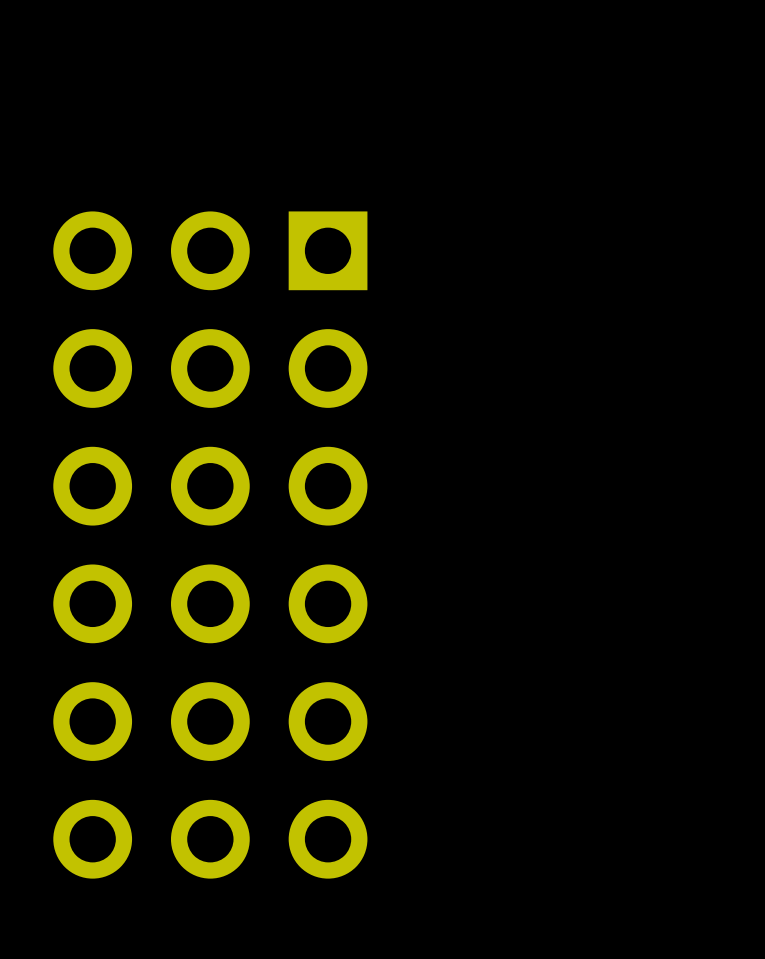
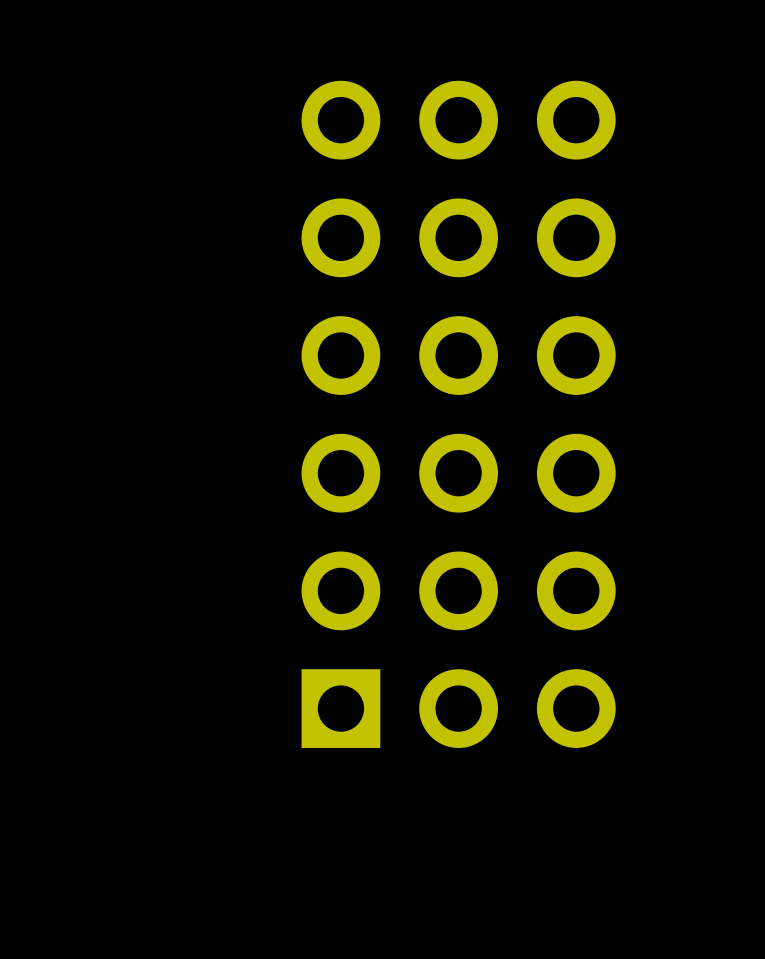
part rotation: 0° (210, 545) -> 180° (458, 414)

